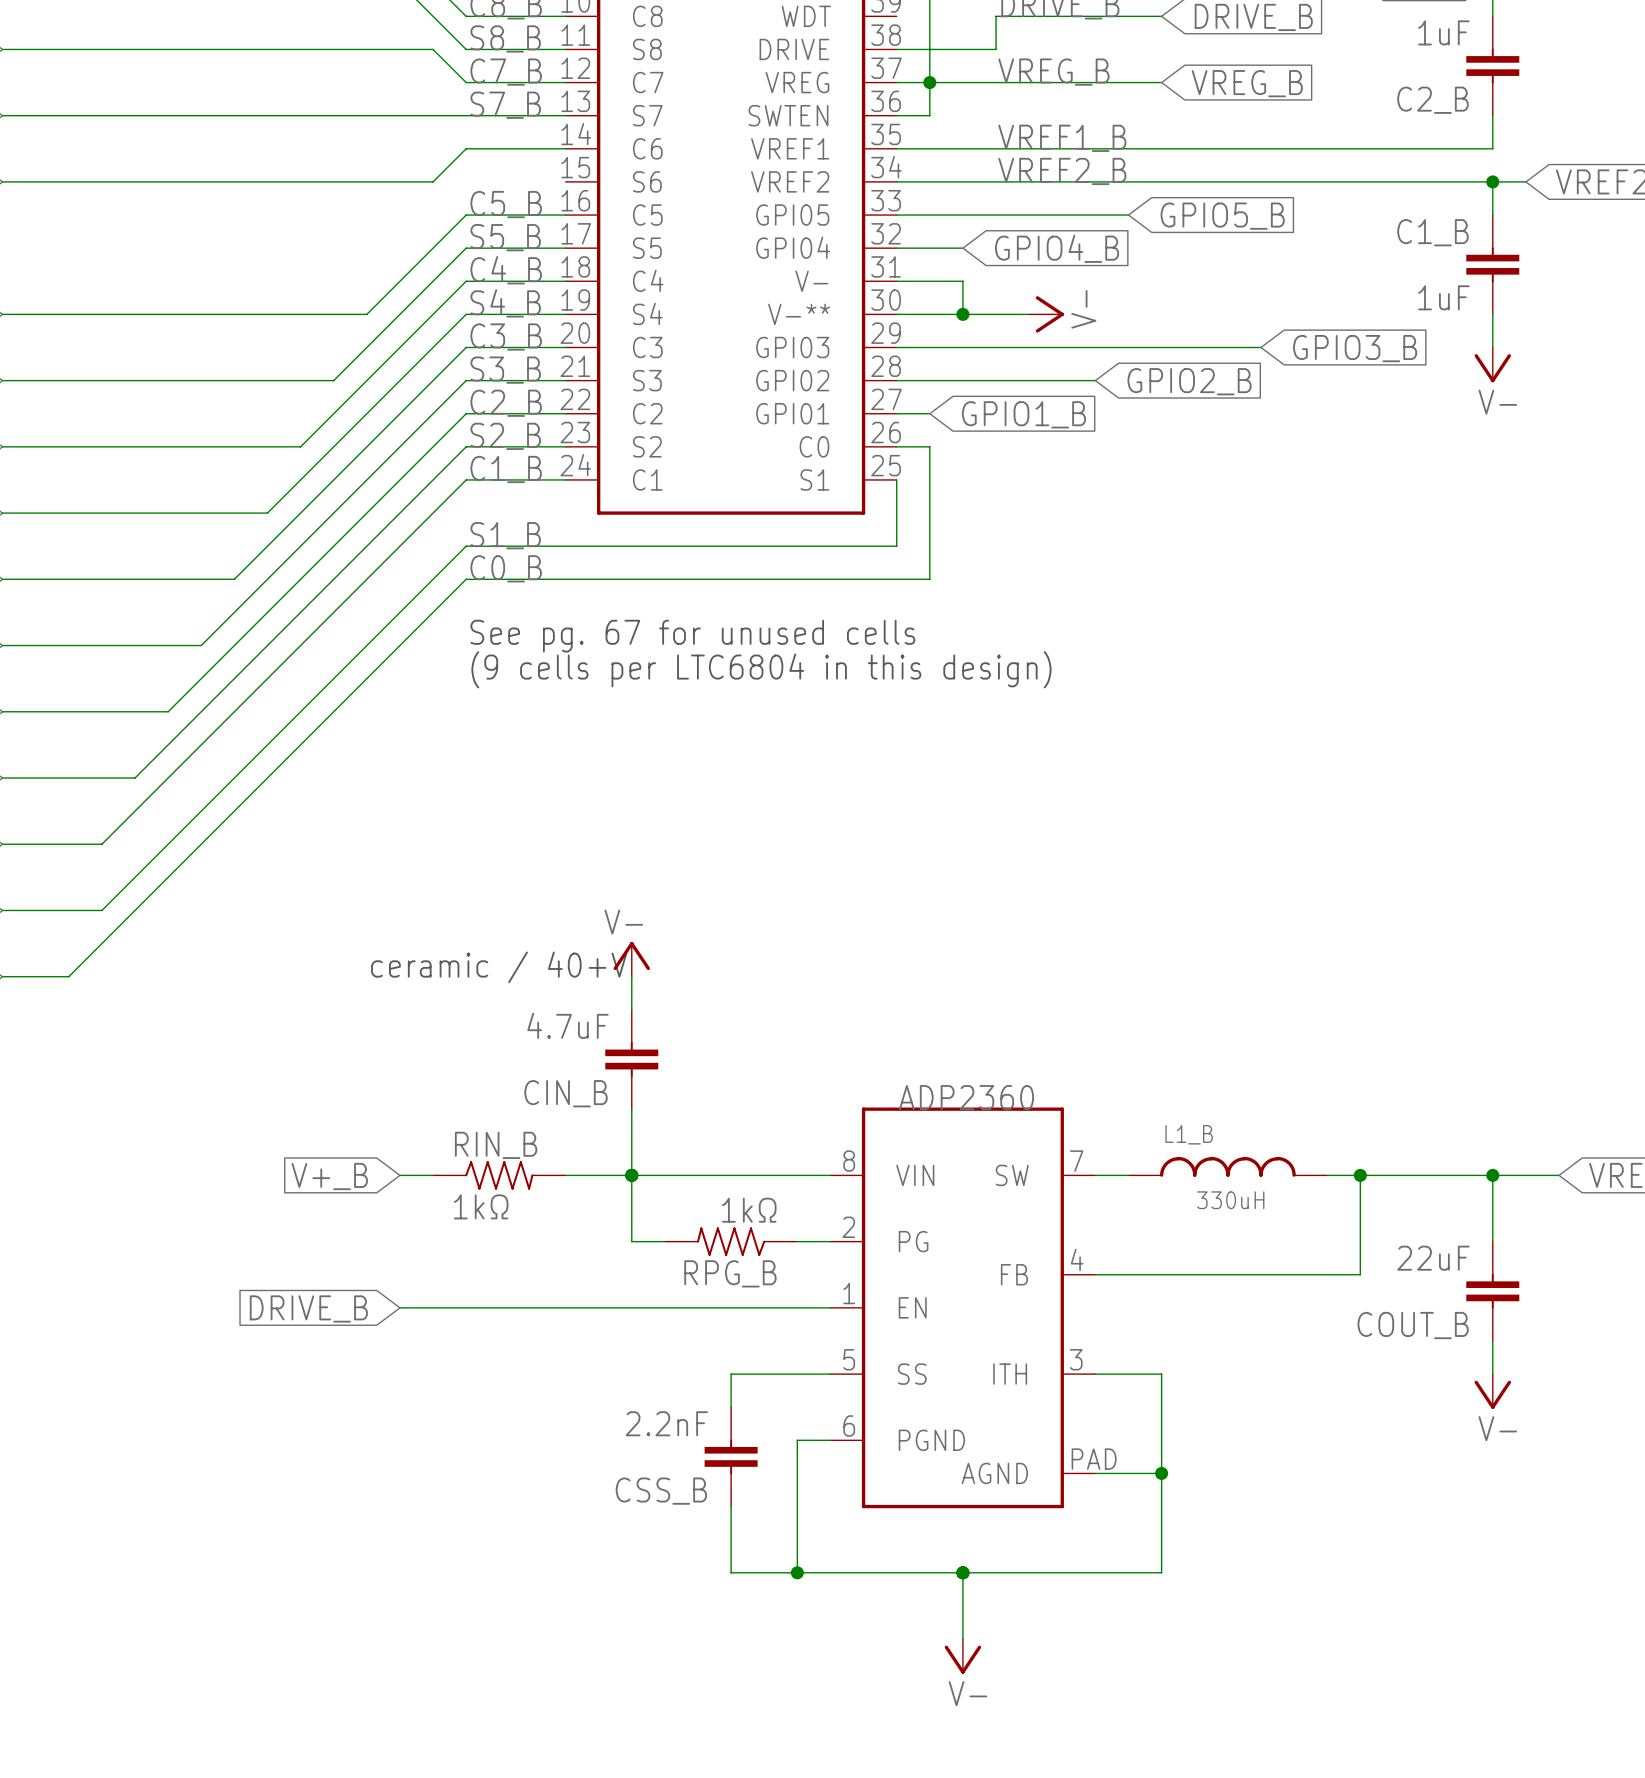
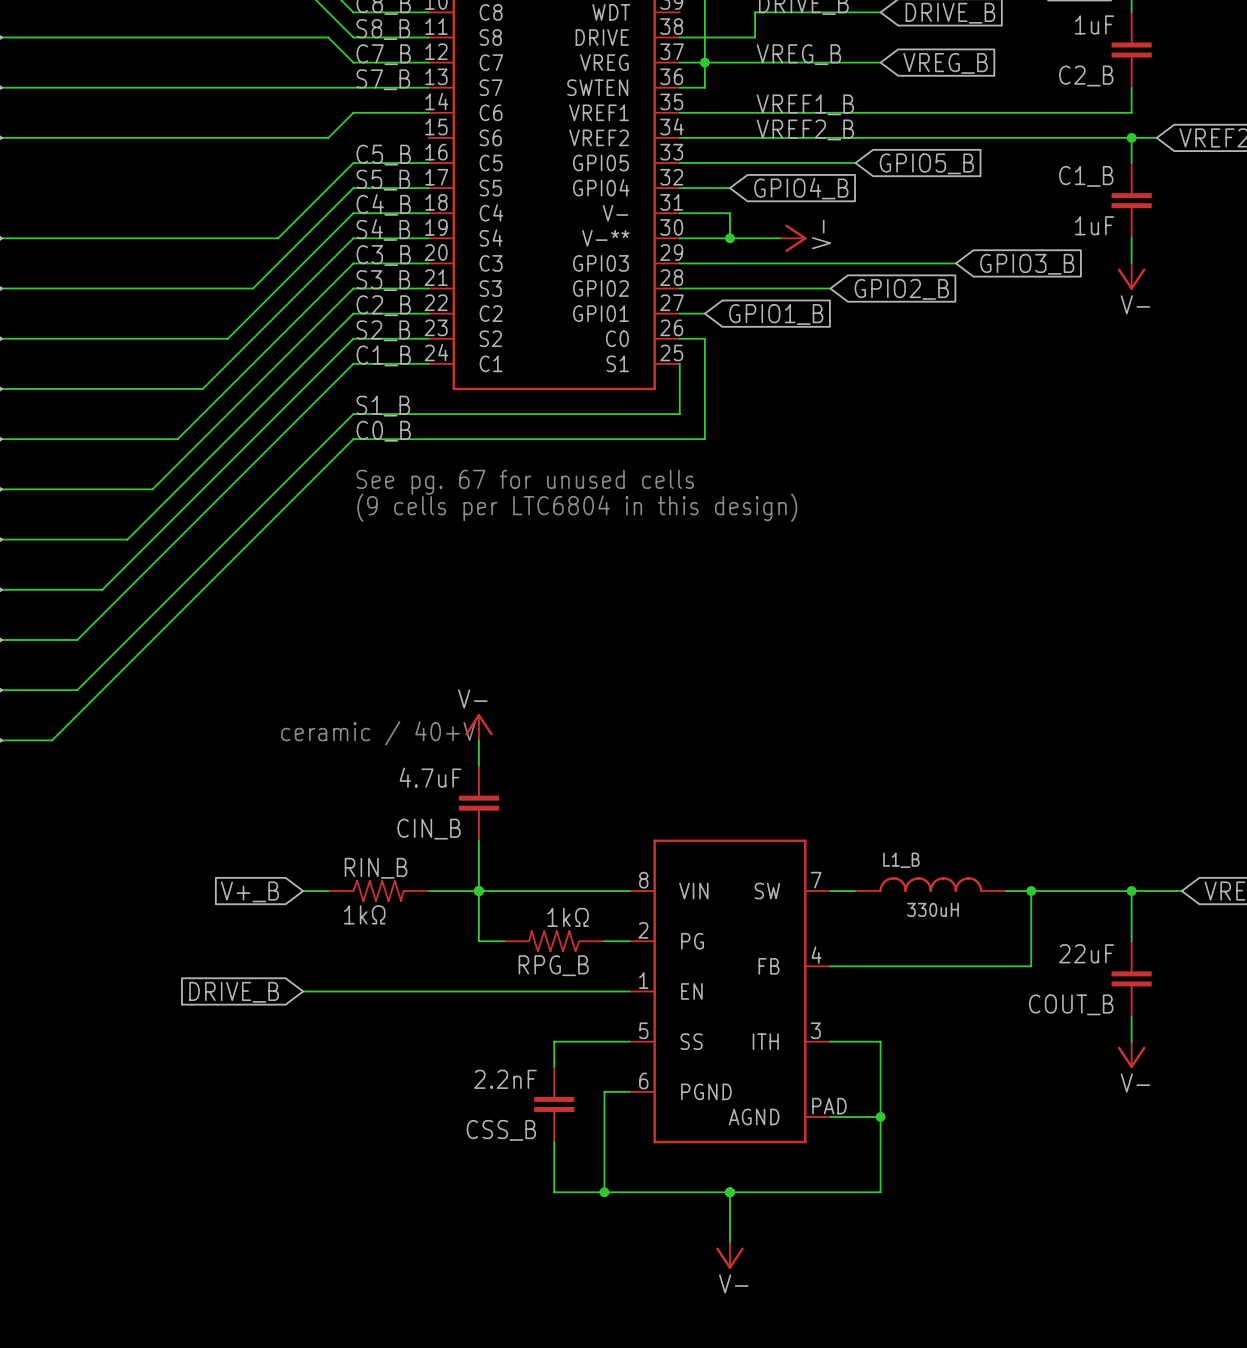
text: ADP2360 (966, 1097) -> none

